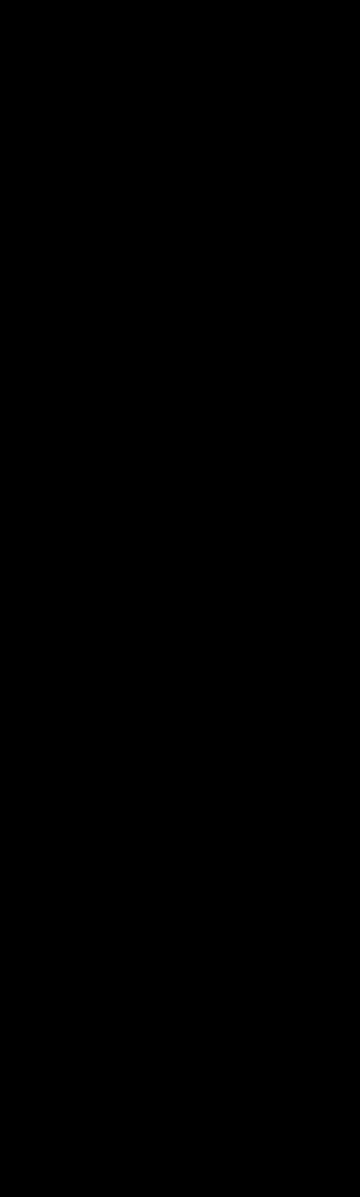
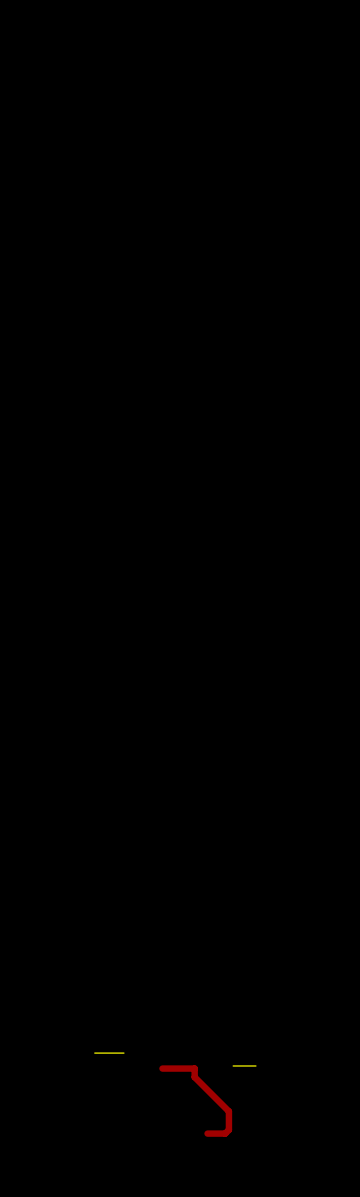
board edge: none -> (94, 1053) (123, 1053)
board edge: none -> (233, 1065) (255, 1065)
top track: none -> (162, 1068) (194, 1068) (194, 1077) (228, 1111) (228, 1129) (225, 1133) (207, 1133)

